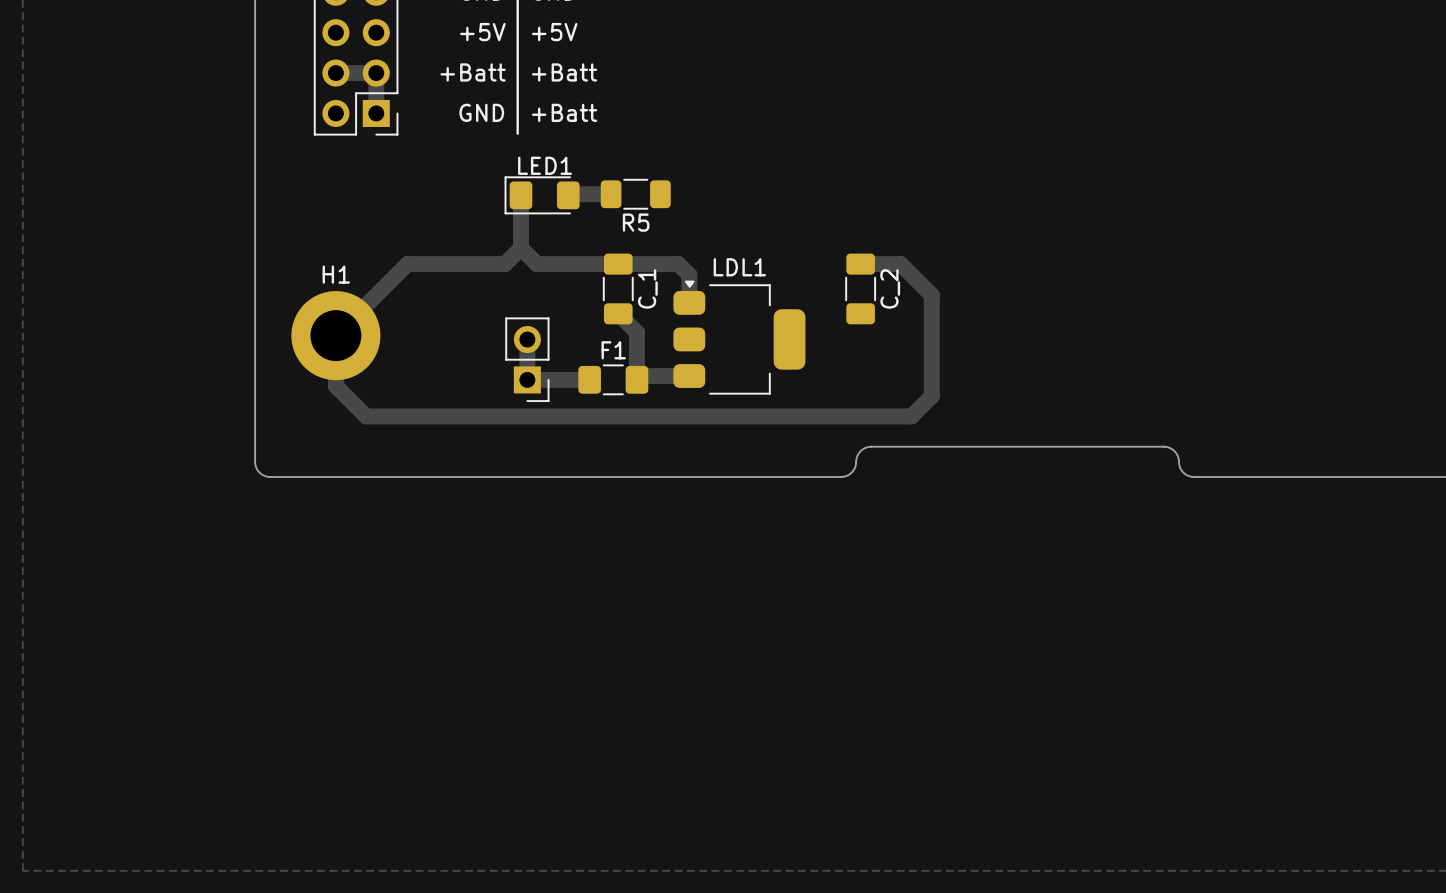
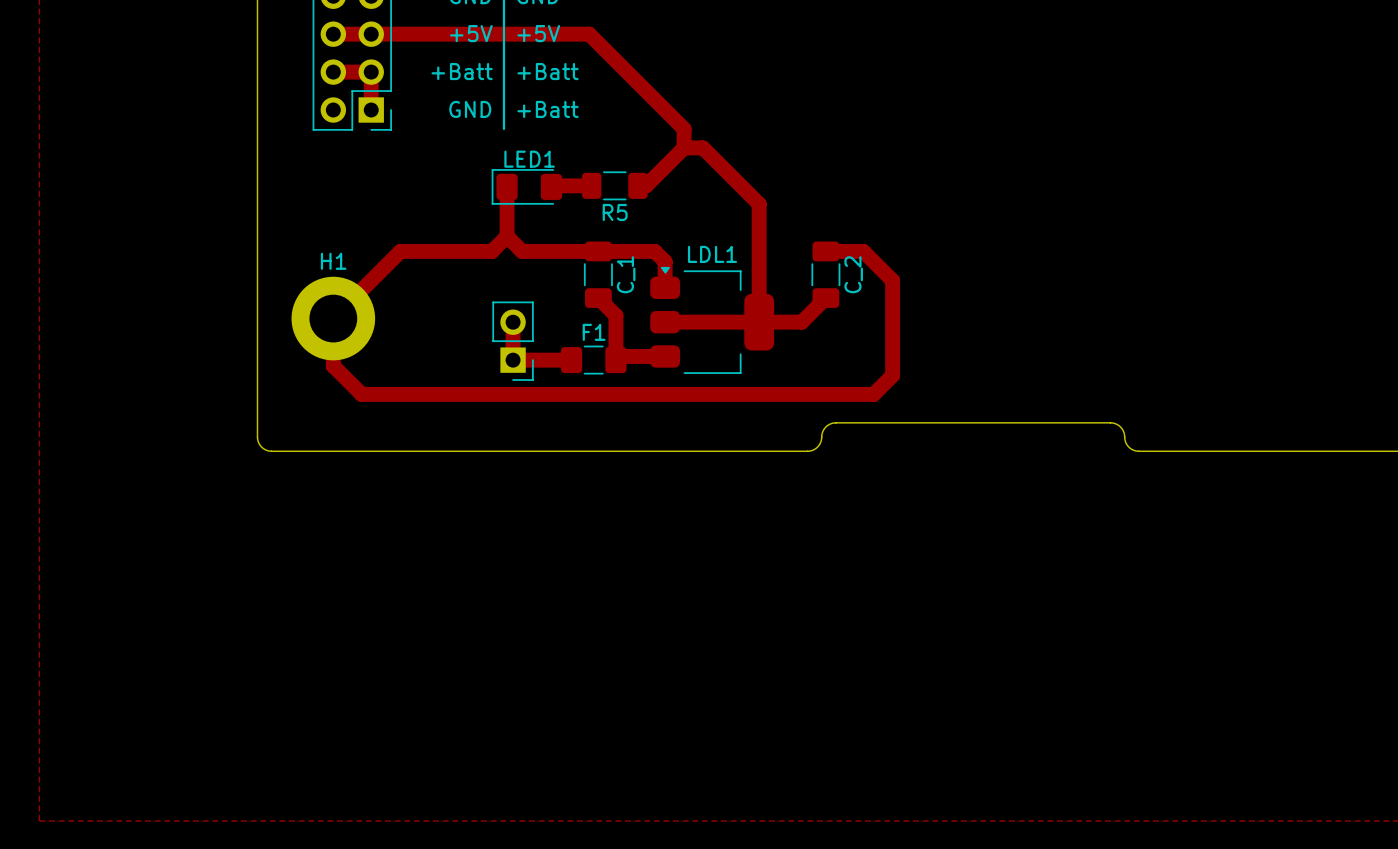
track: none -> (333, 34) (589, 34) (684, 128) (684, 147)
track: none -> (684, 147) (703, 147) (759, 204) (759, 322)
track: none -> (684, 147) (646, 185) (637, 185)
track: none -> (825, 298) (801, 322) (665, 322)

